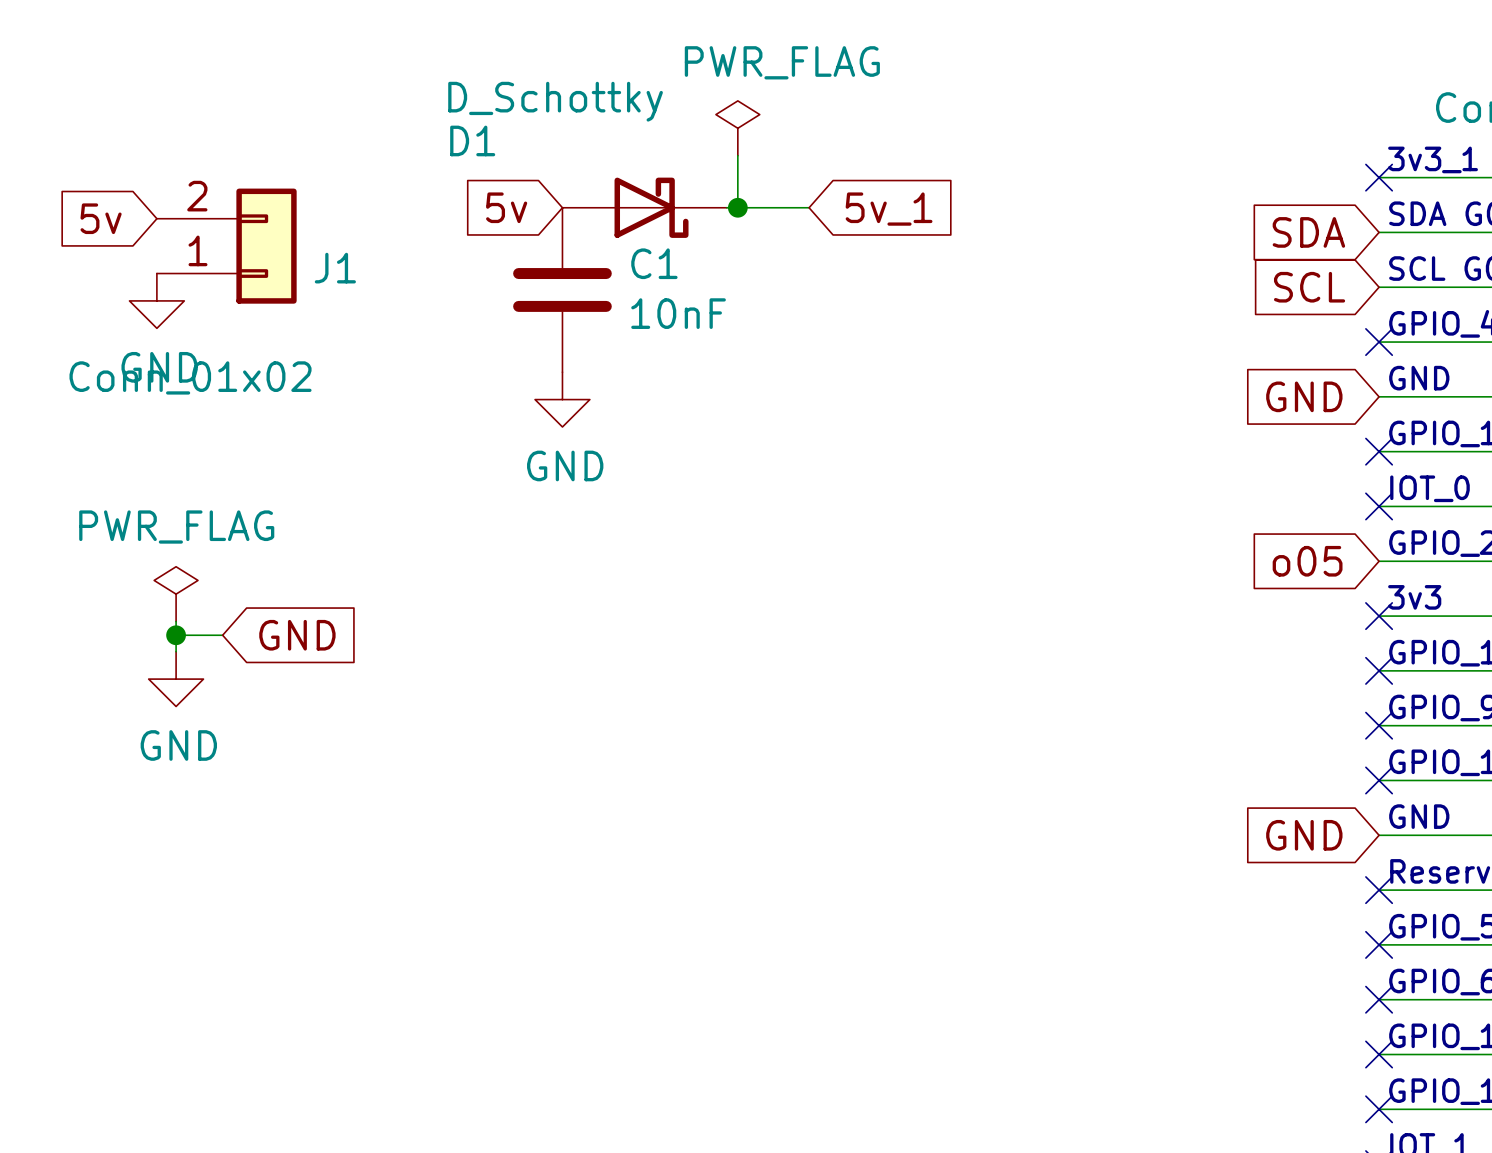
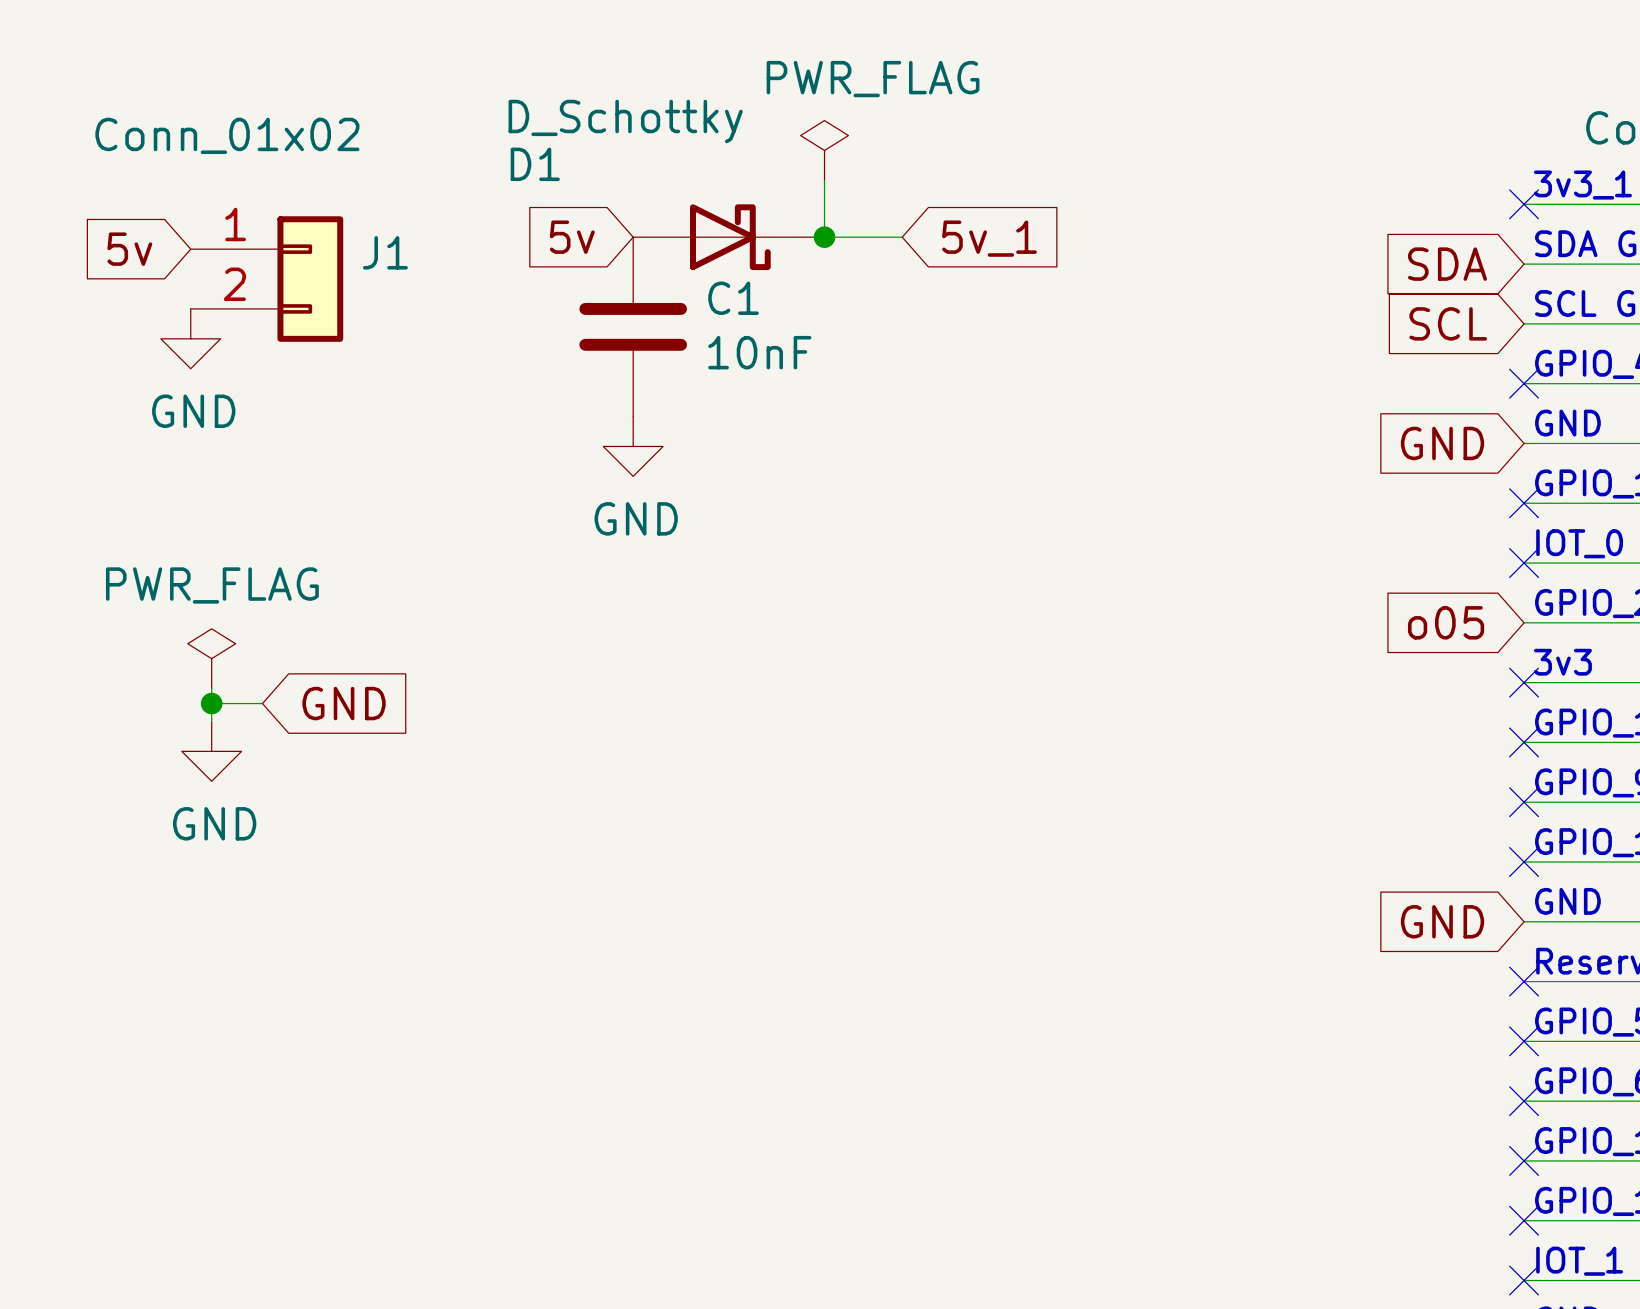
J1 flip: as is (266, 246) -> up-down (310, 279)

